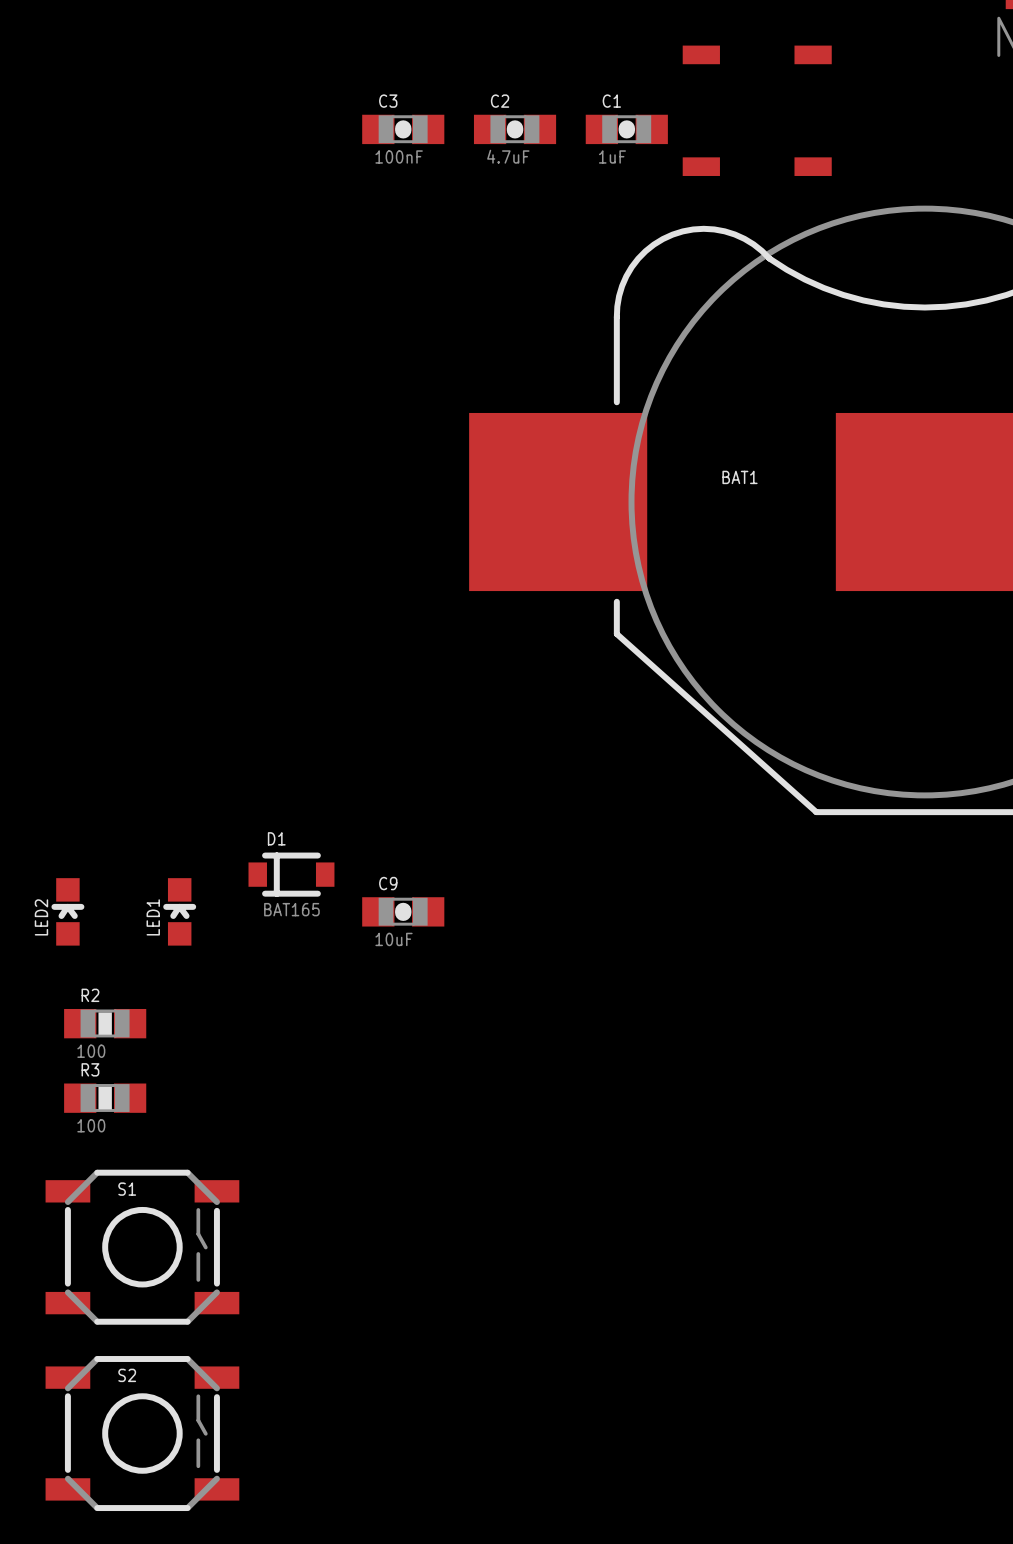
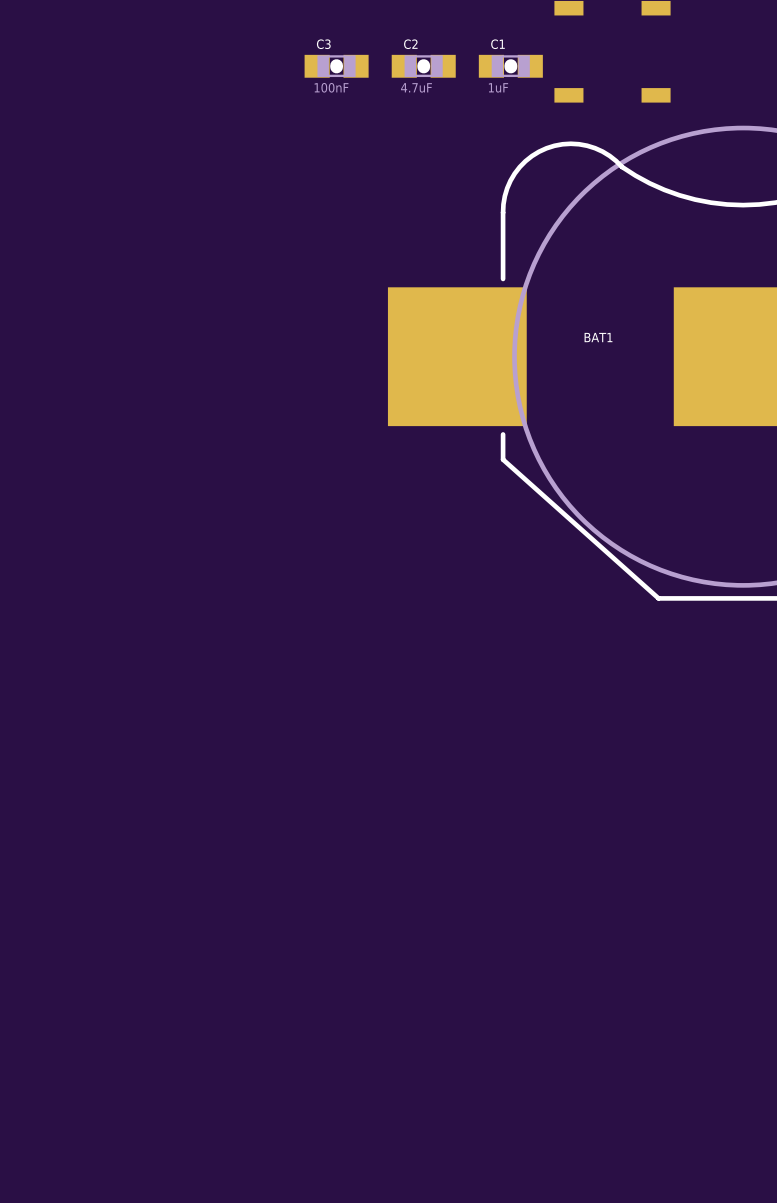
D1: BAT165 (291, 874) -> none
LED2: (67, 911) -> none
LED1: (179, 911) -> none
C9: 10uF (403, 911) -> none
R2: 100 (105, 1023) -> none
R3: 100 (105, 1098) -> none
S1: (142, 1247) -> none
S2: (142, 1433) -> none

